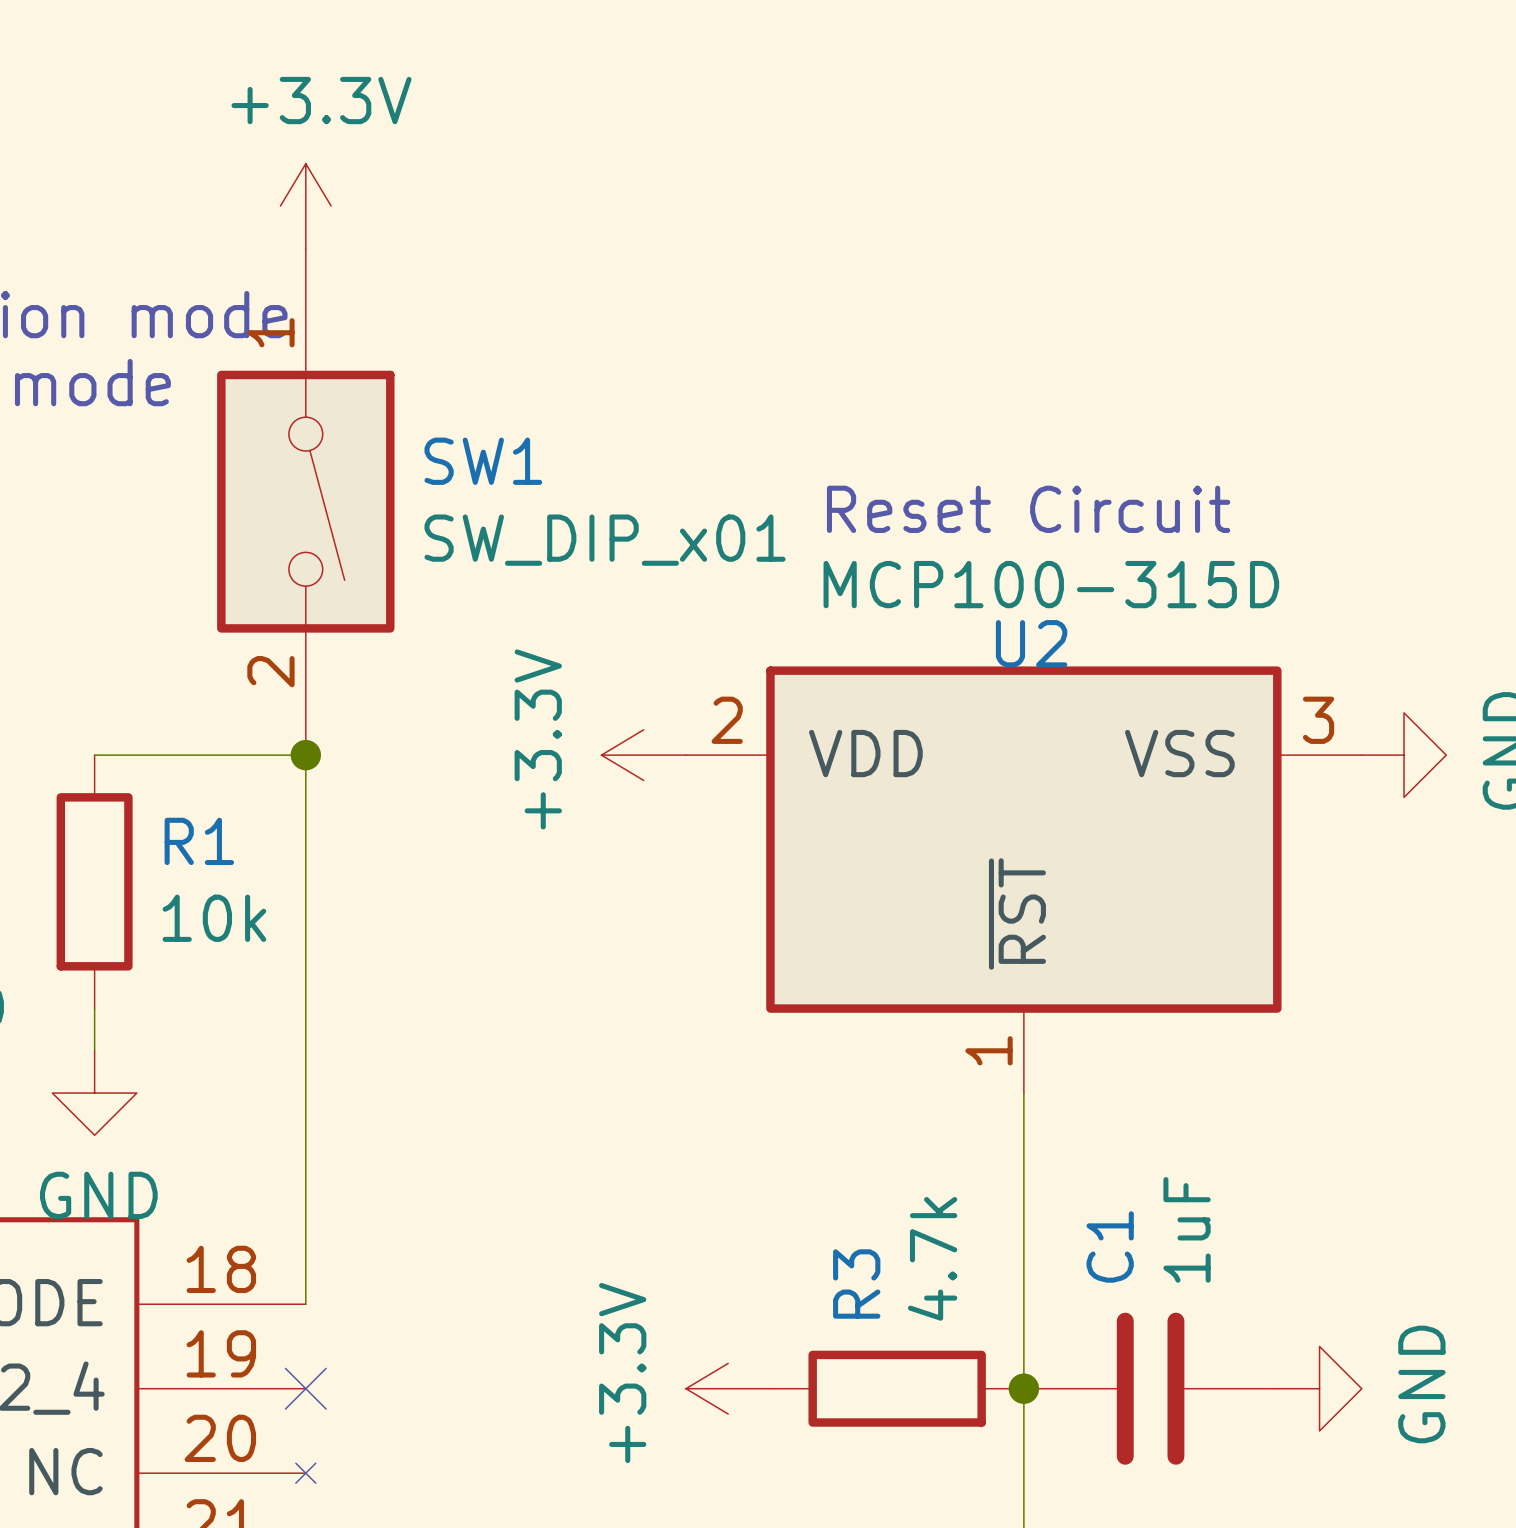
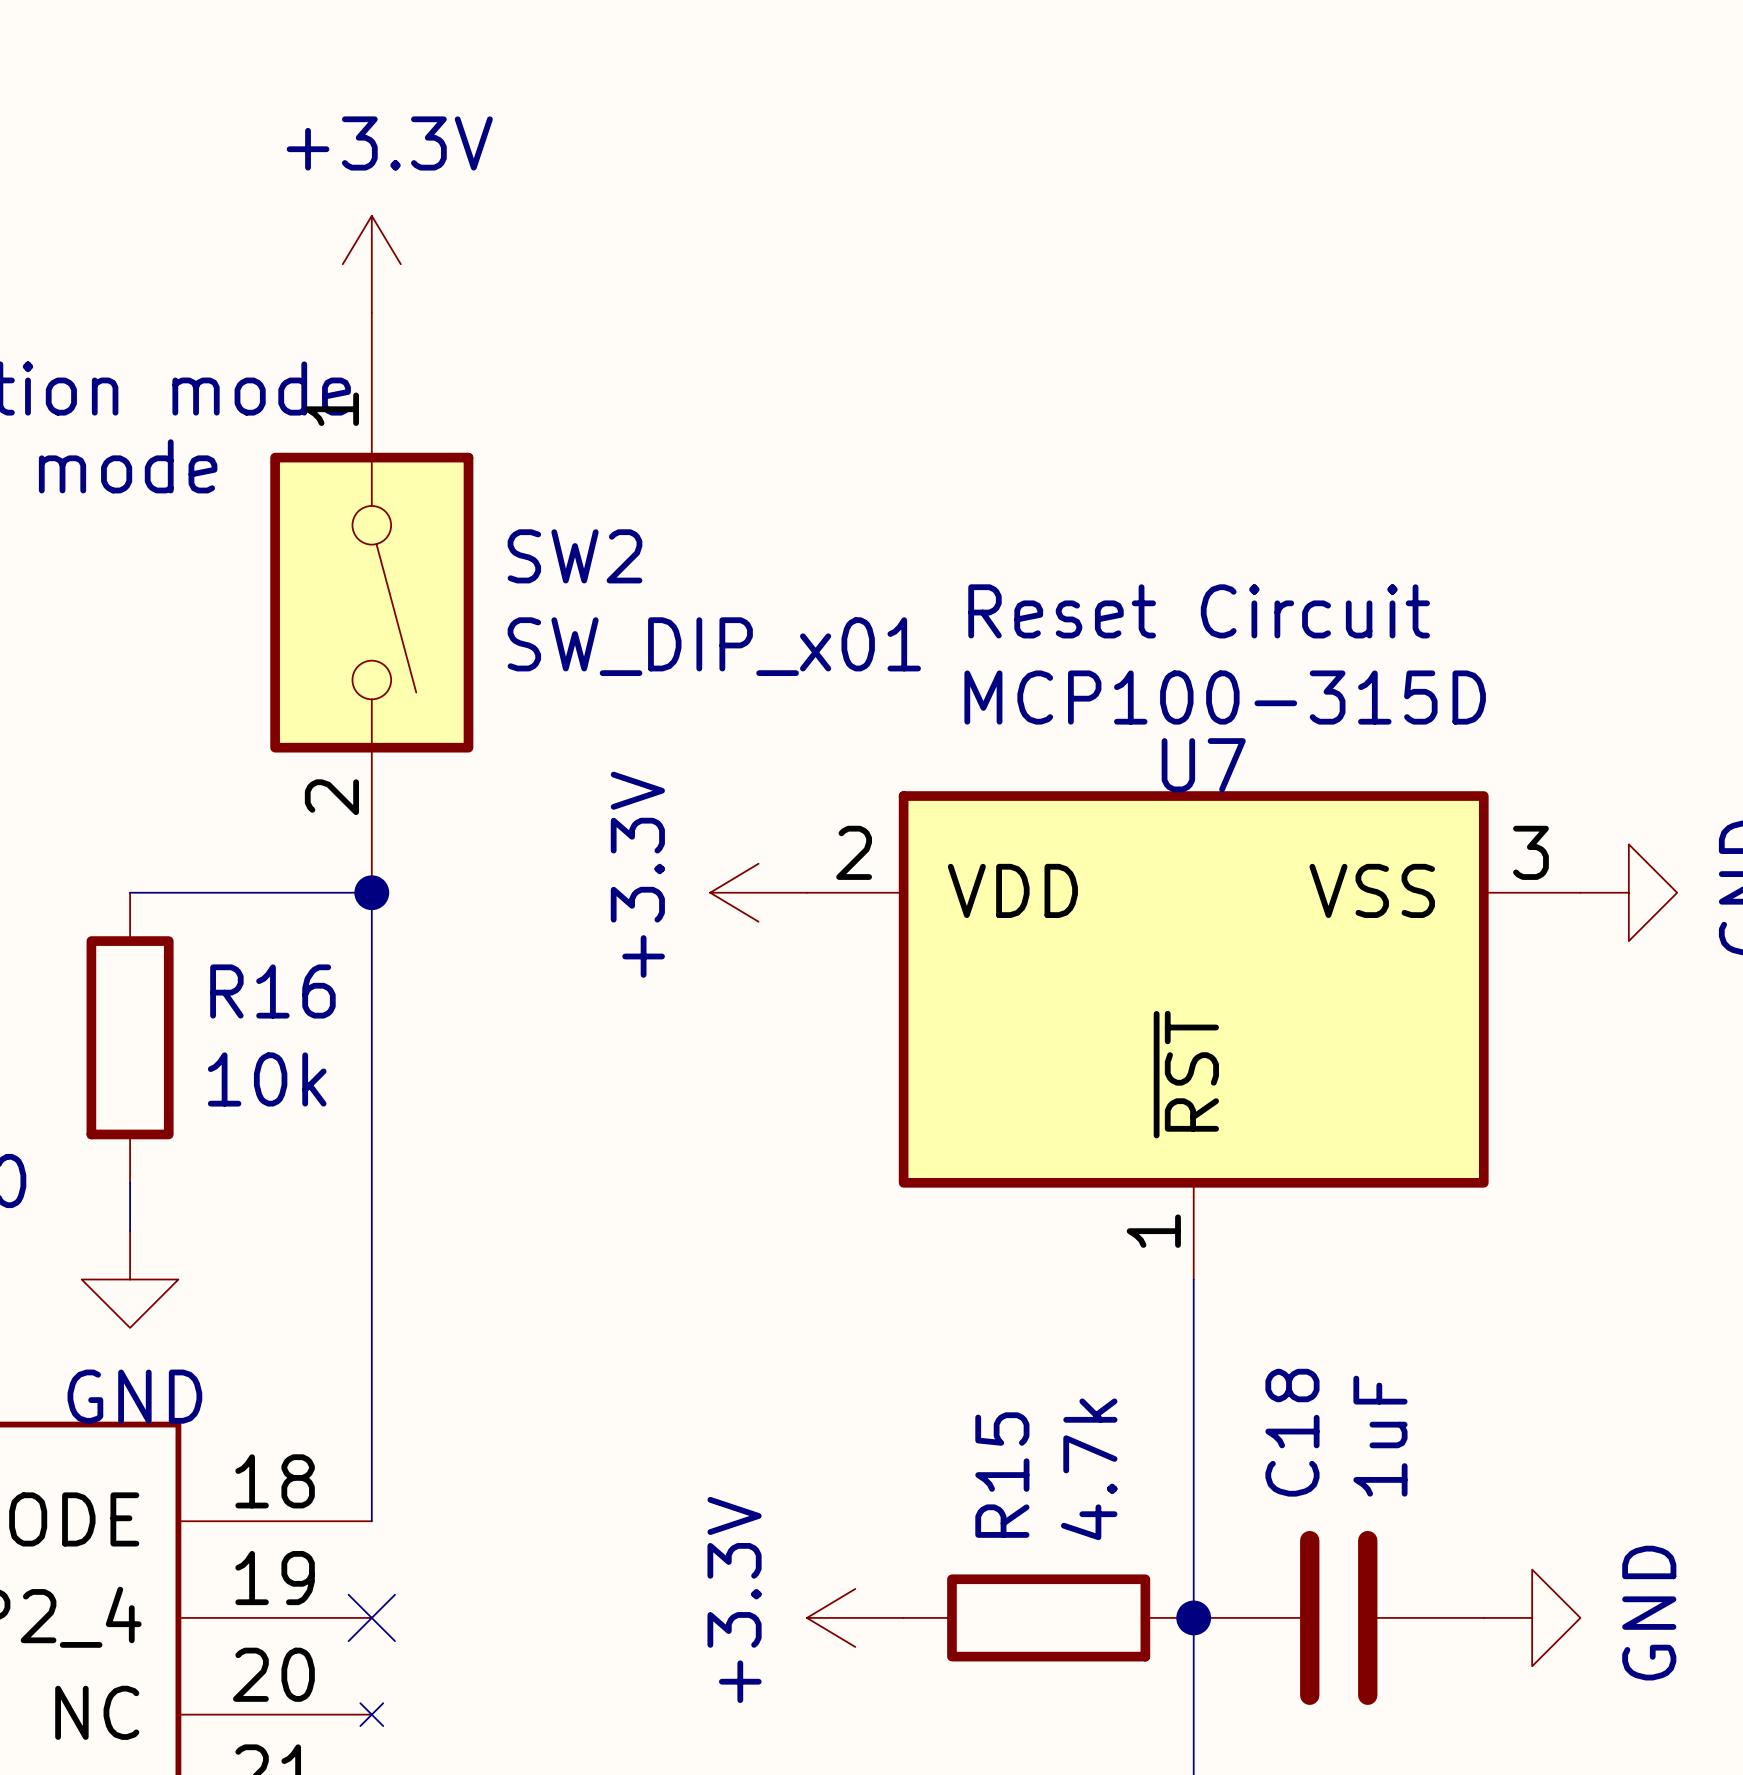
SW1 name: SW1 (483, 461) -> SW2 (575, 556)
U2 name: U2 (1031, 643) -> U7 (1203, 765)
R1 name: R1 (199, 841) -> R16 (272, 991)
C1 name: C1 (1110, 1246) -> C18 (1292, 1432)
R3 name: R3 (856, 1284) -> R15 (1002, 1475)

